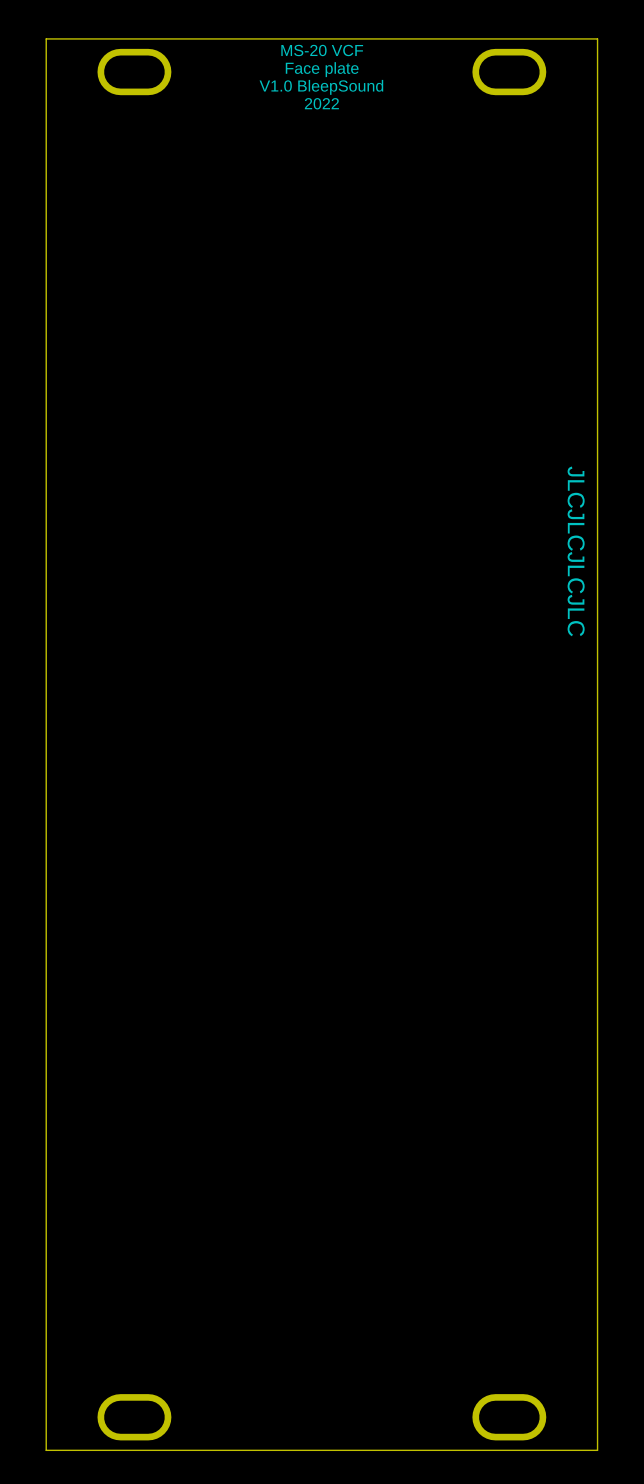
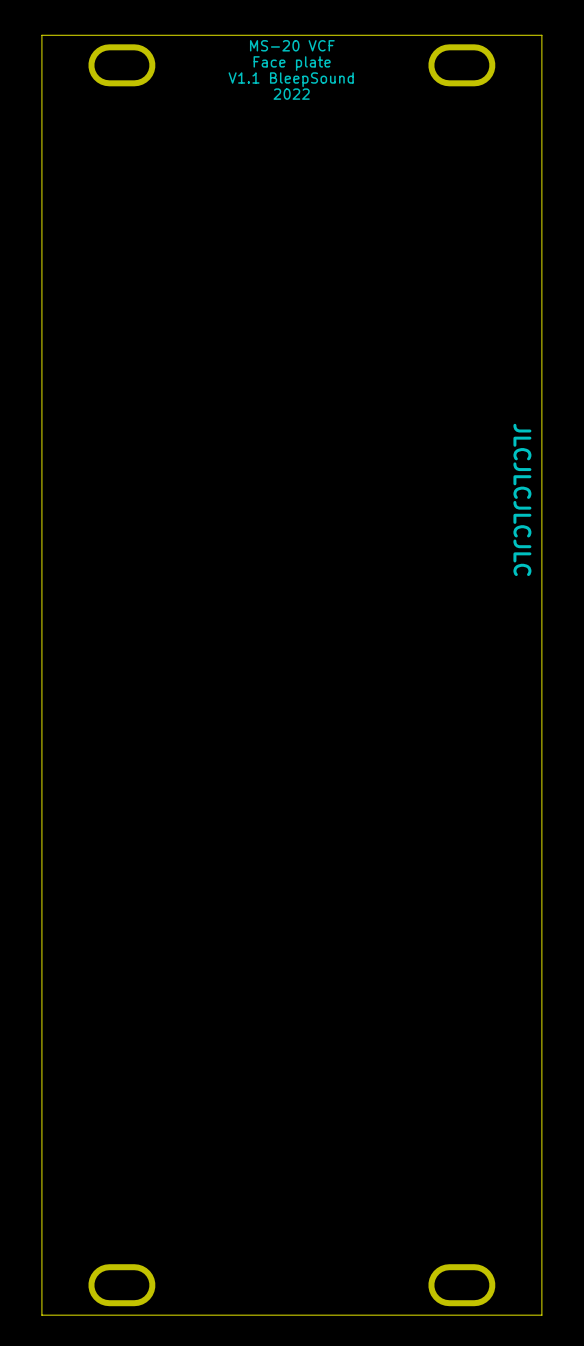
text: V1.0 BleepSound (321, 87) -> V1.1 BleepSound (291, 79)

